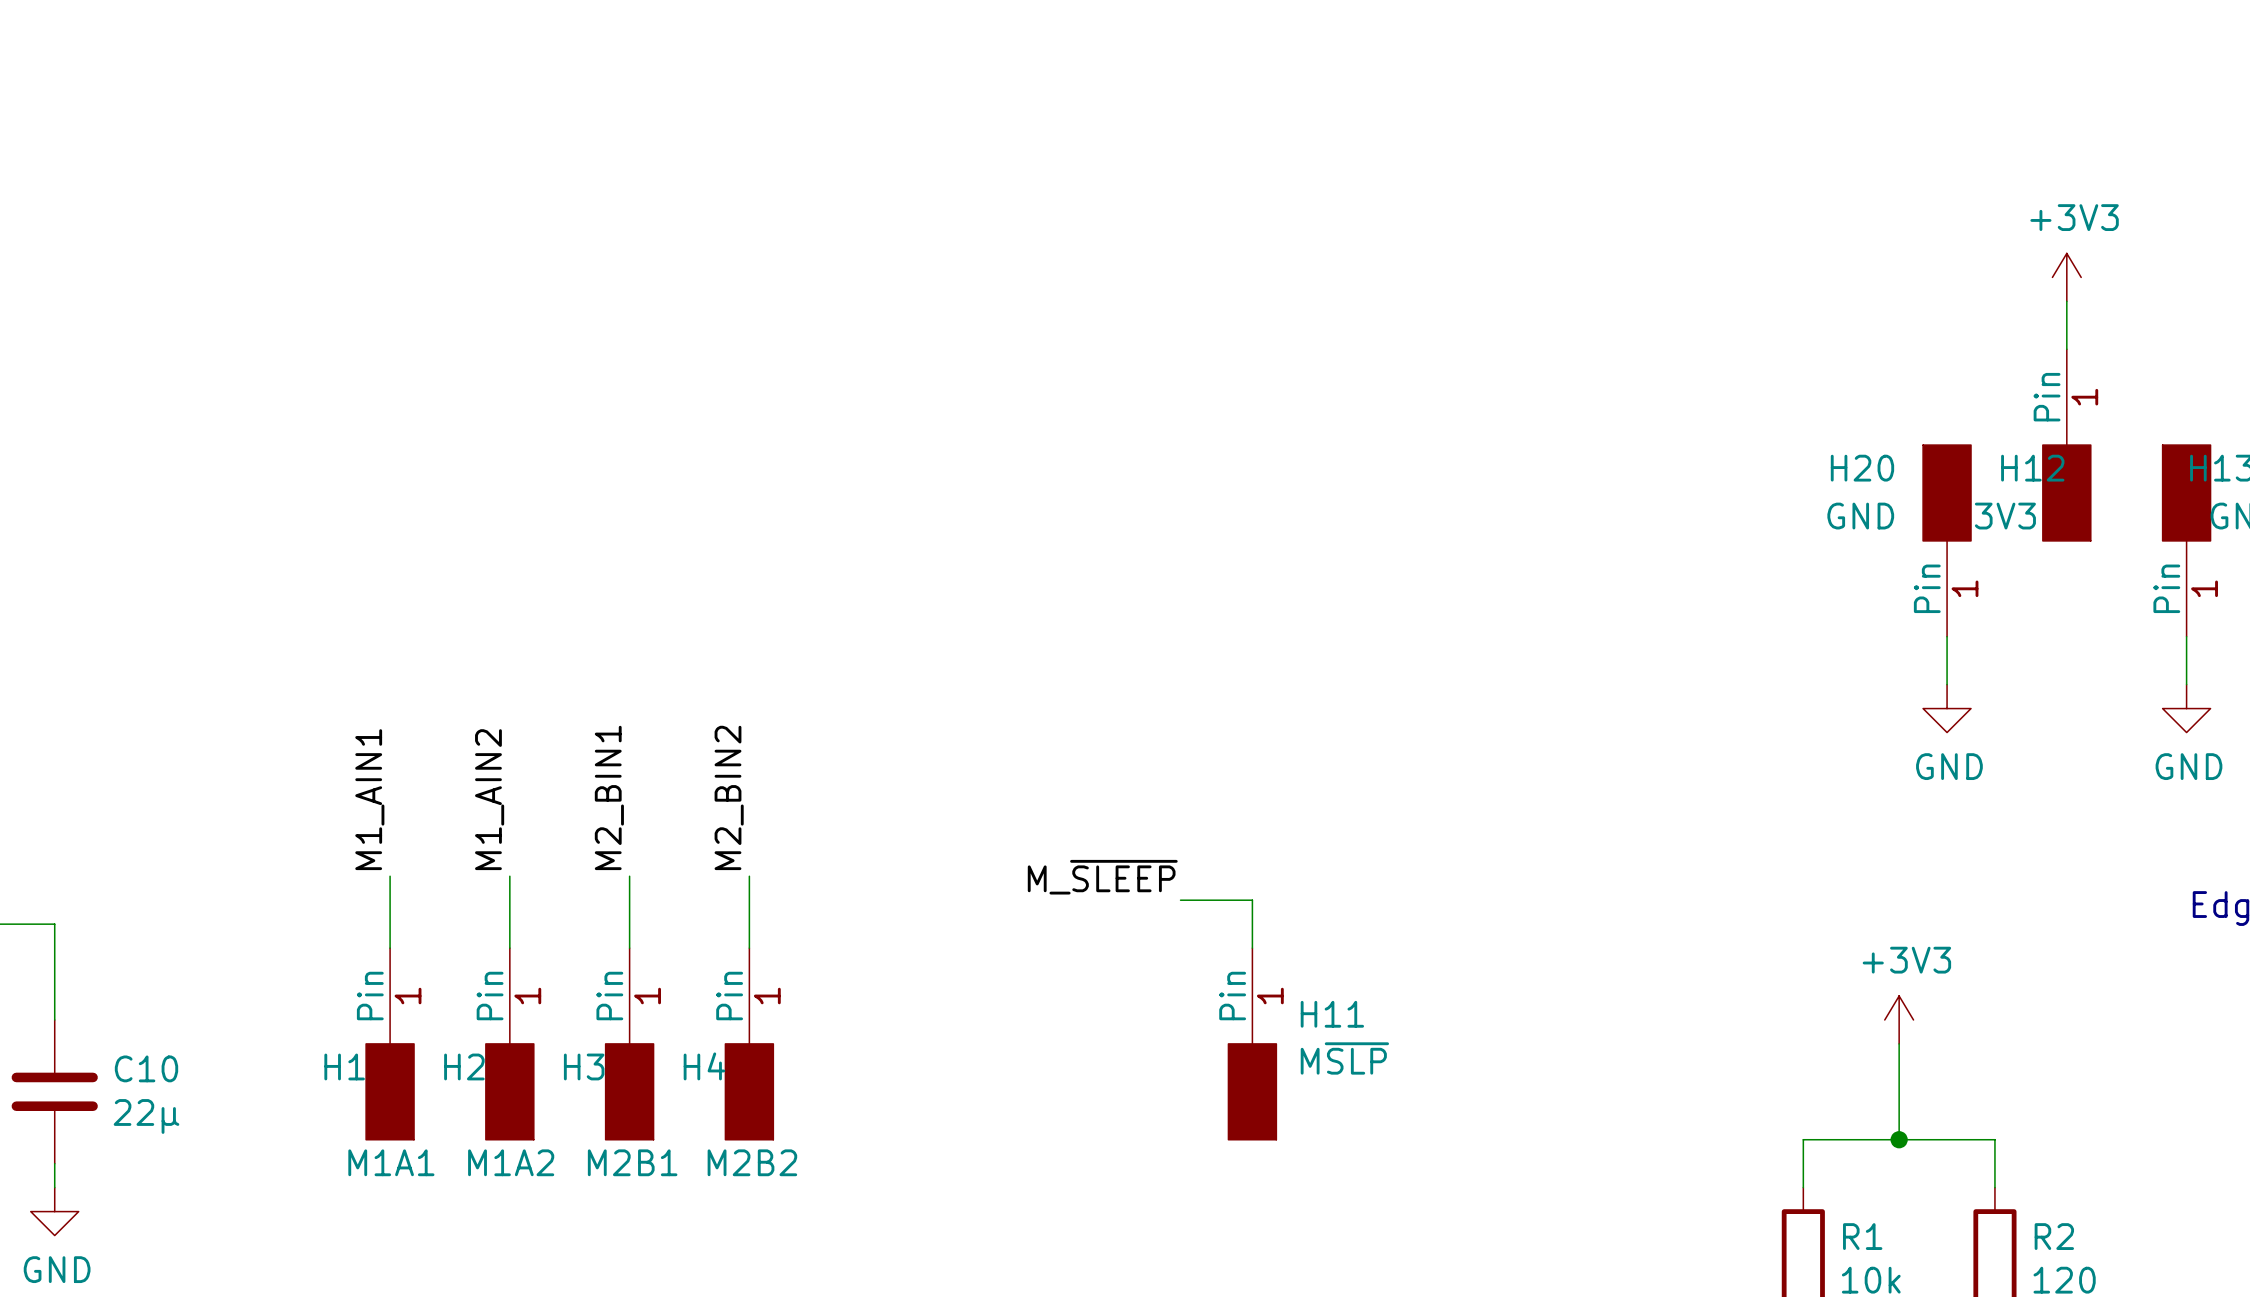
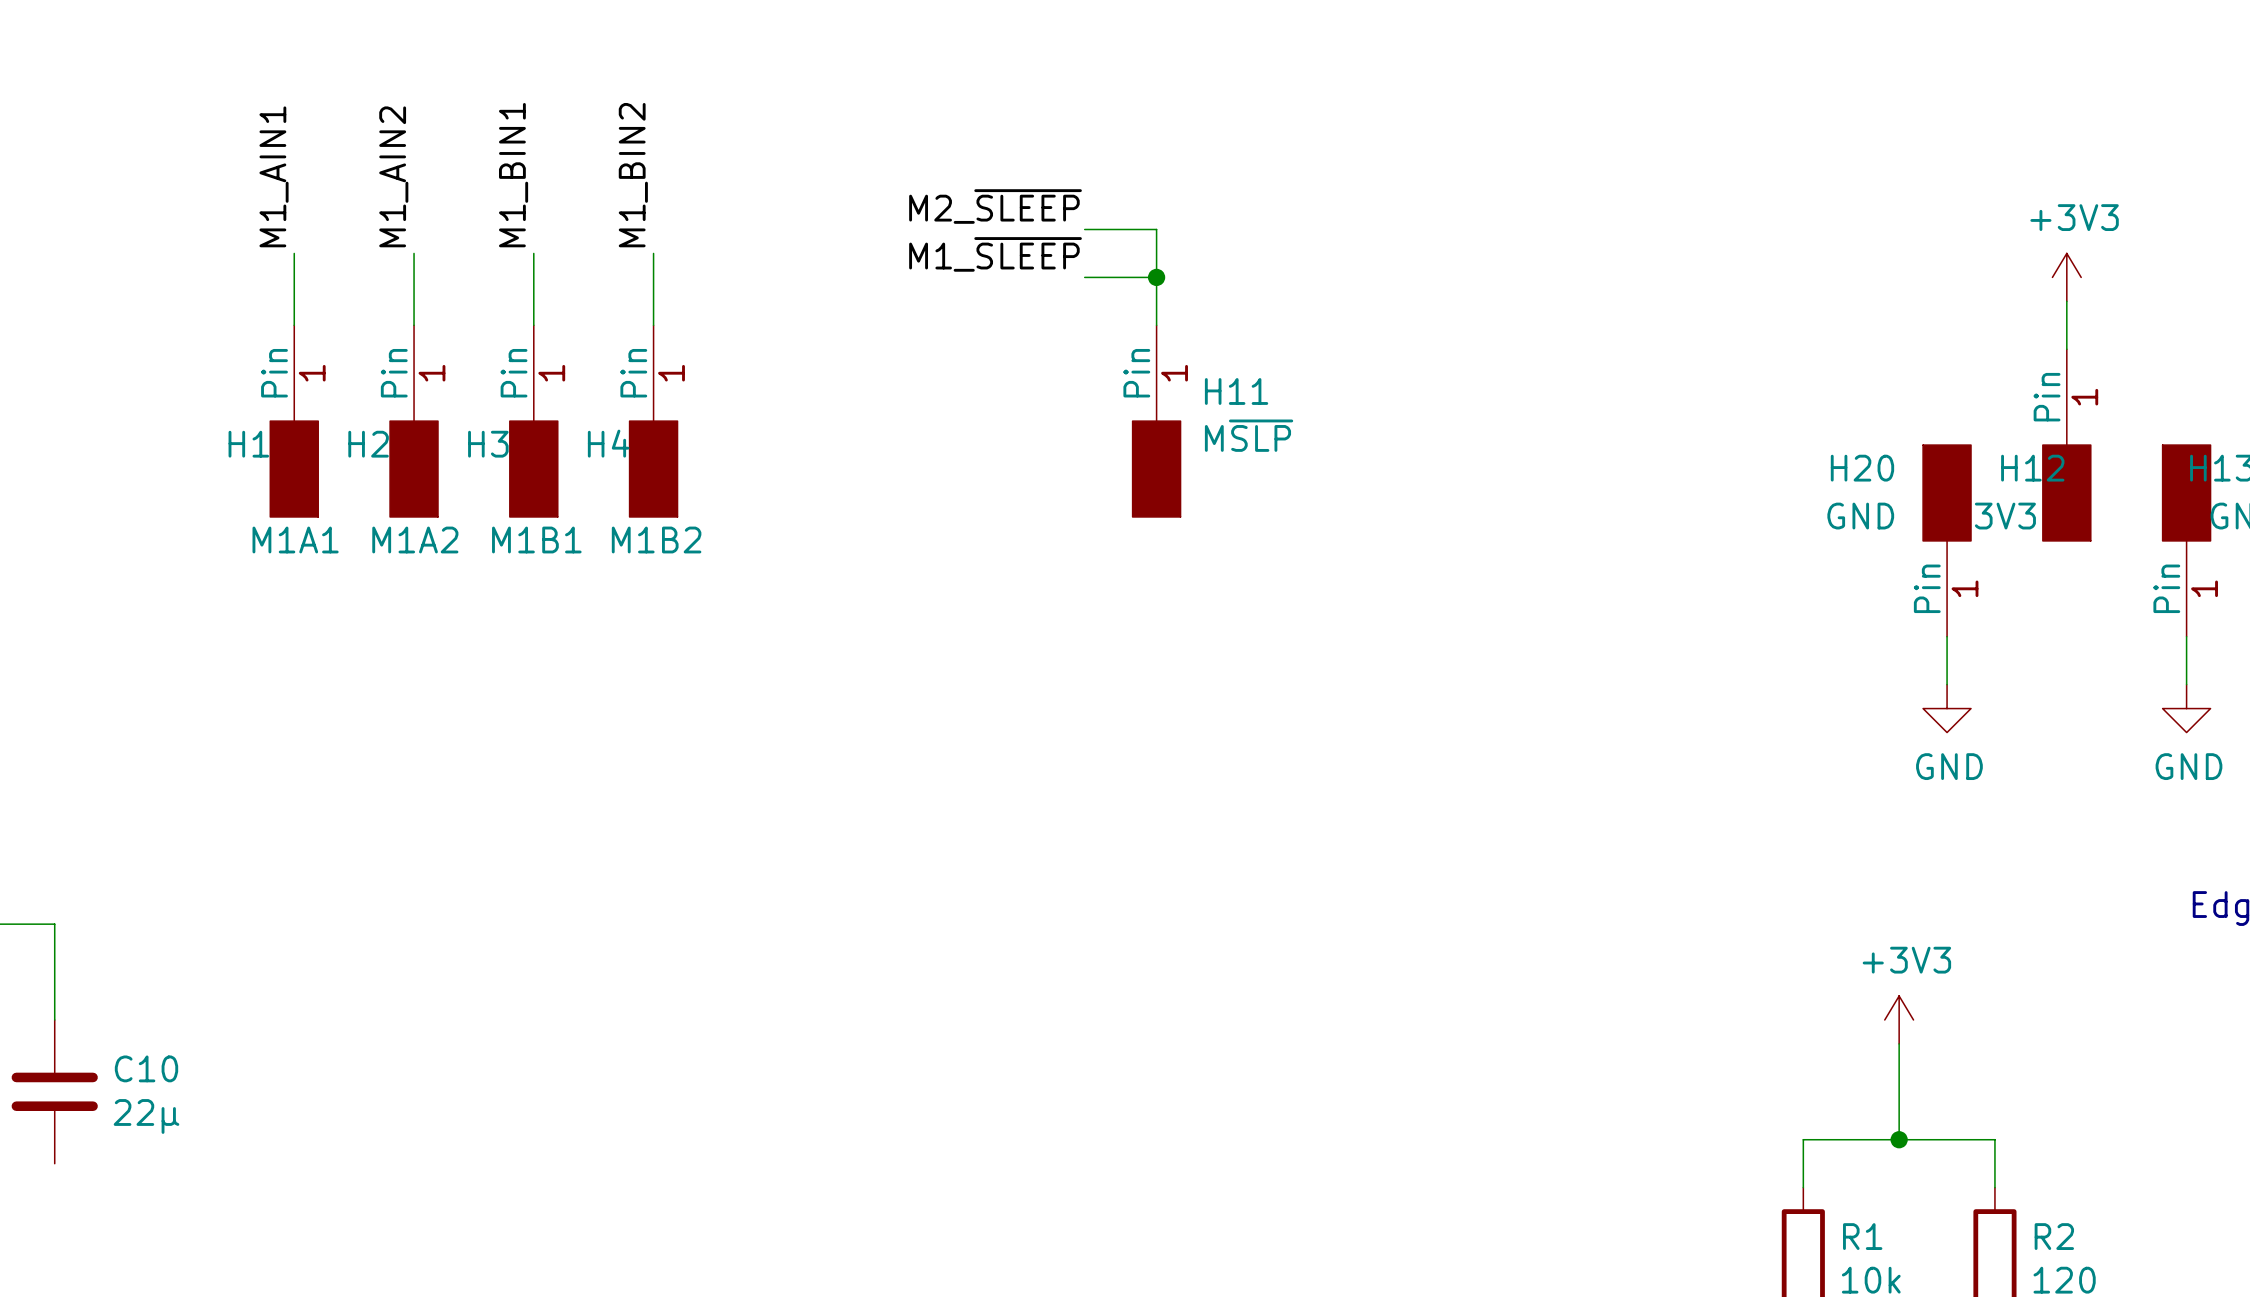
label: none -> M1_BIN1 (513, 175)
label: none -> M1_BIN2 (633, 175)
label: none -> M1_AIN1 (274, 176)
label: none -> M1_AIN2 (393, 176)
label: none -> M2_~{SLEEP} (995, 206)
wire: none -> (1084, 229) (1156, 229) (1156, 325)
wire: none -> (294, 253) (294, 325)
wire: none -> (414, 253) (414, 325)
wire: none -> (533, 253) (533, 325)
wire: none -> (653, 253) (653, 325)
label: none -> M1_~{SLEEP} (995, 254)
wire: none -> (1084, 277) (1156, 277)
junction: none -> (1156, 277)
label: M2_BIN1 (609, 797) -> none
label: M2_BIN2 (729, 797) -> none
label: M1_AIN1 (369, 799) -> none
label: M1_AIN2 (489, 799) -> none
wire: (390, 876) (390, 948) -> none
wire: (509, 876) (509, 948) -> none
wire: (629, 876) (629, 948) -> none
wire: (749, 876) (749, 948) -> none
label: M_~{SLEEP} (1102, 877) -> none
wire: (1180, 900) (1252, 900) (1252, 948) -> none
H1 position: (390, 1043) -> (294, 421)
H2 position: (509, 1043) -> (414, 421)
H3 position: (629, 1043) -> (533, 421)
H4 position: (749, 1043) -> (653, 421)
H11 position: (1252, 1043) -> (1156, 421)
H3 value: M2B1 (632, 1162) -> M1B1 (536, 540)
H4 value: M2B2 (752, 1162) -> M1B2 (656, 540)
wire: (54, 1163) (54, 1187) -> none
power symbol: GND (54, 1211) -> none

